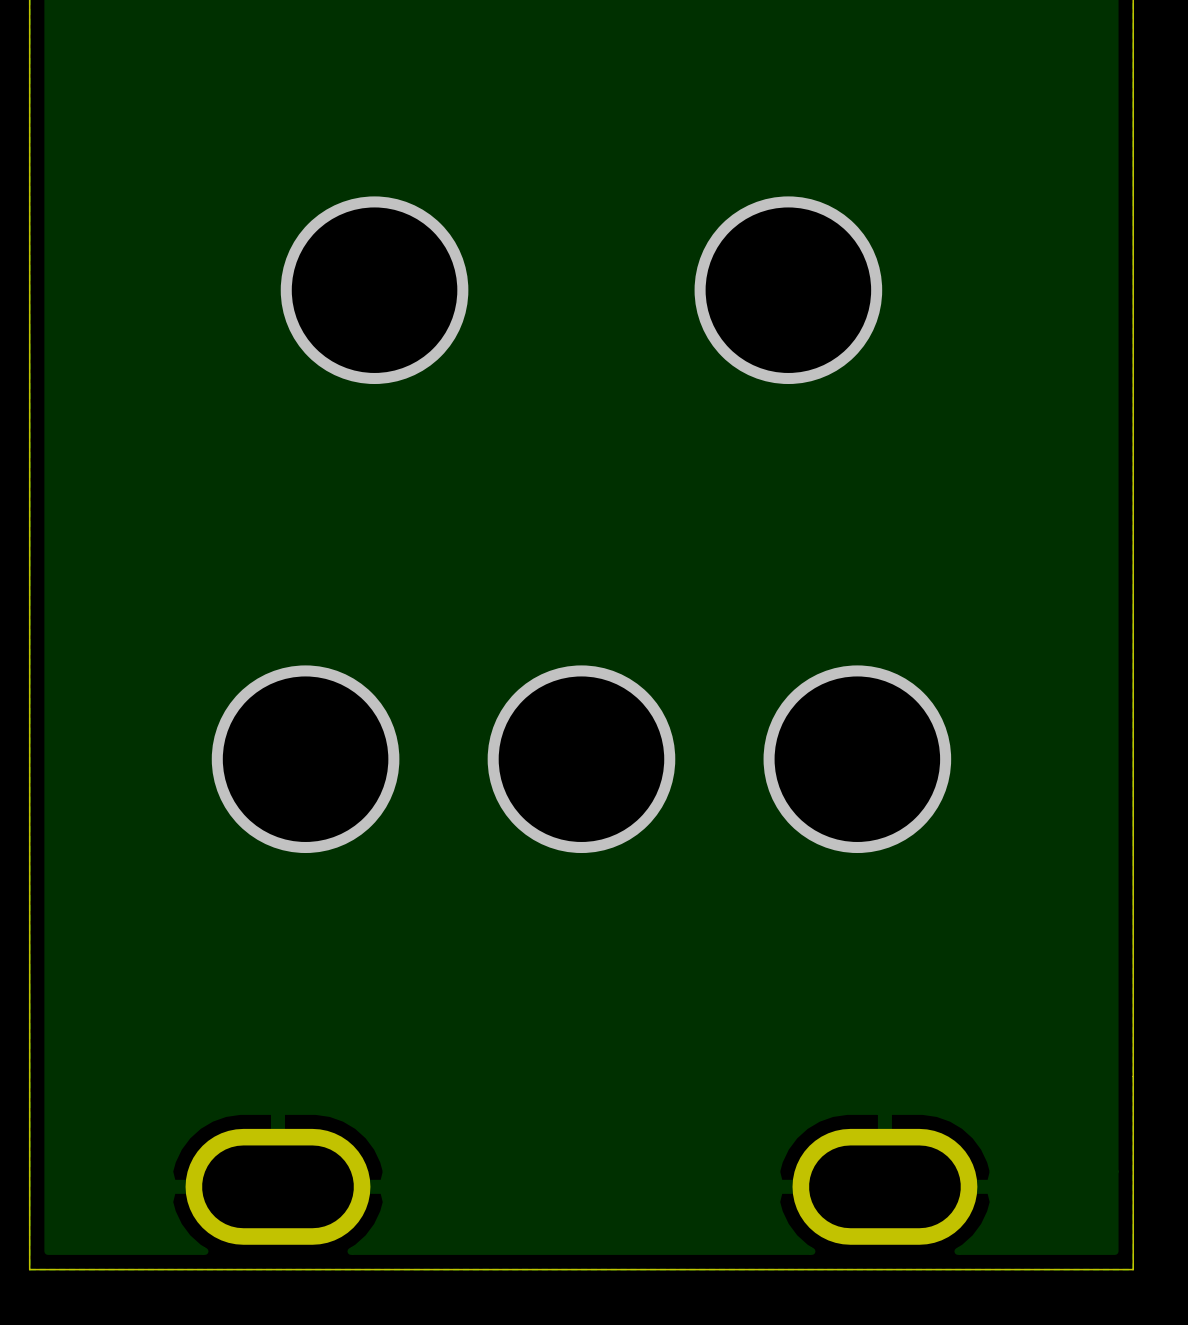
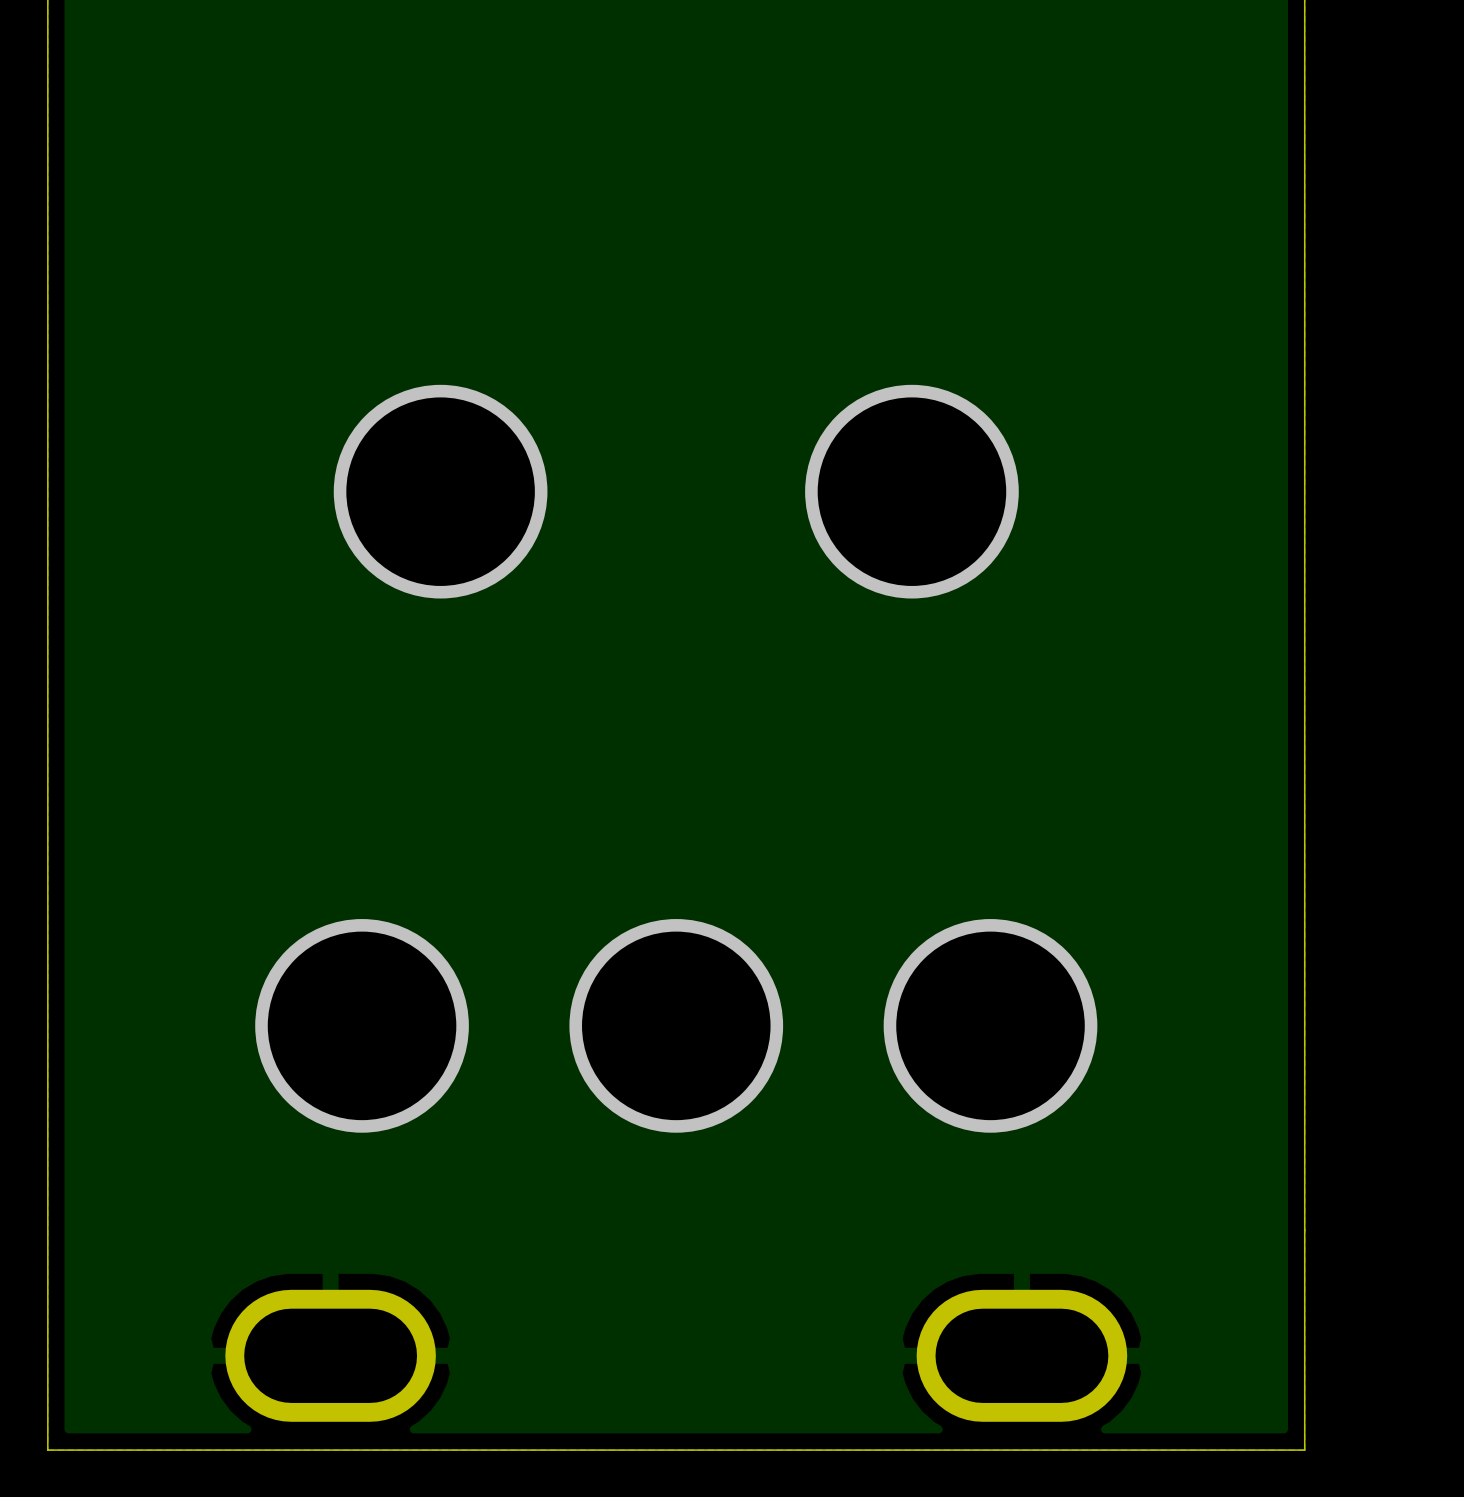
via position: (374, 290) -> (440, 491)
via position: (788, 290) -> (911, 491)
via position: (305, 759) -> (362, 1025)
via position: (581, 759) -> (676, 1025)
via position: (857, 759) -> (990, 1025)

